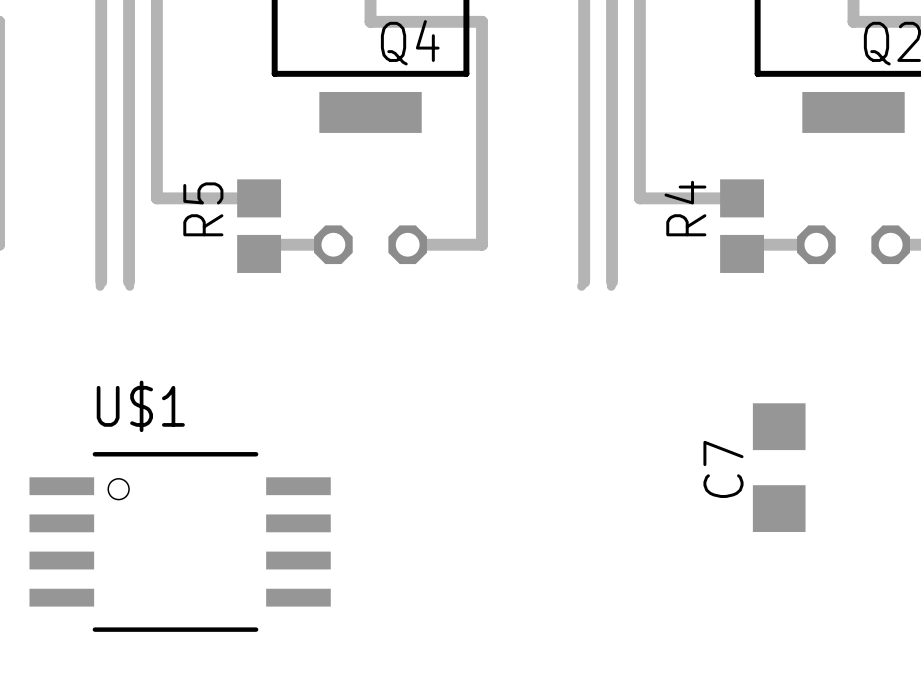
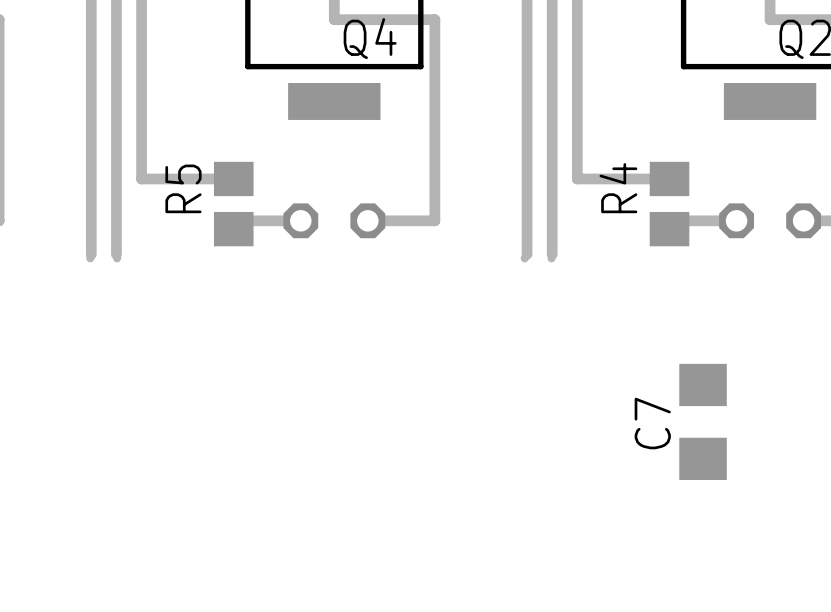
U$1: (180, 541) -> none

